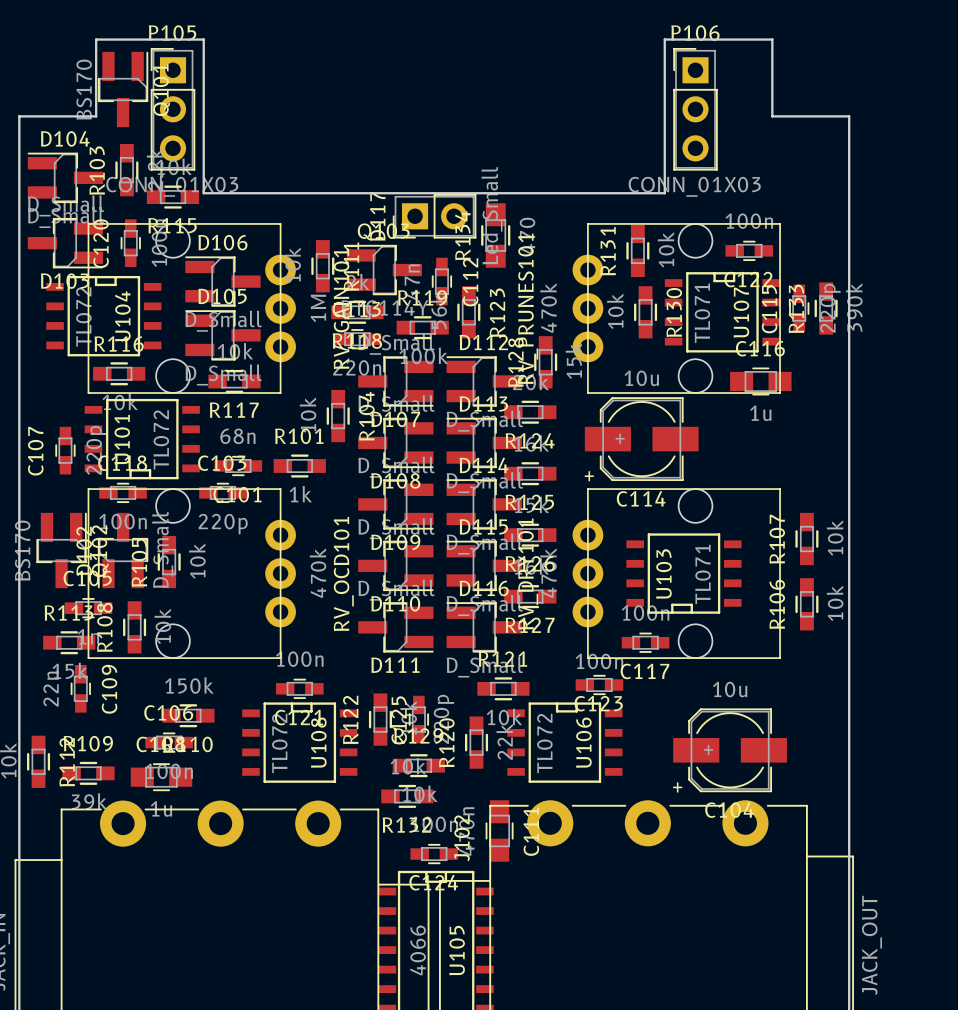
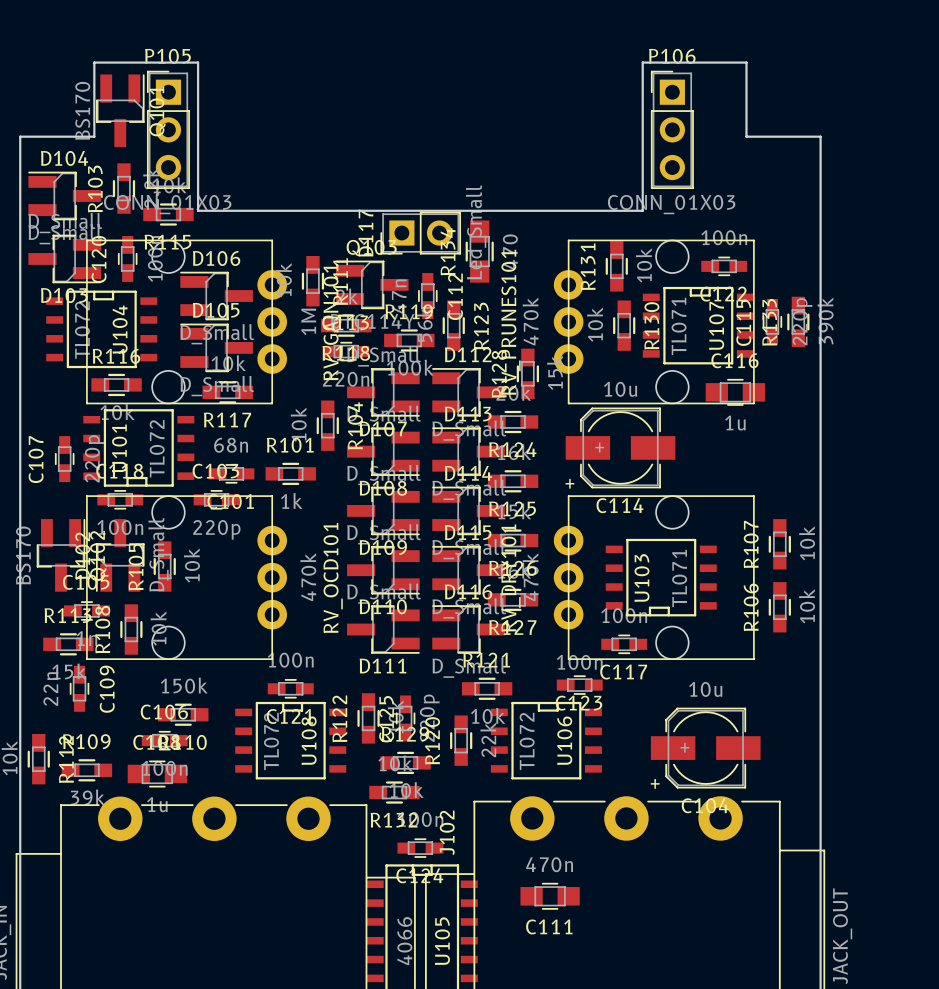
C111 rotation: 0° (499, 830) -> 90° clockwise (550, 896)
C111 position: (499, 830) -> (550, 896)

